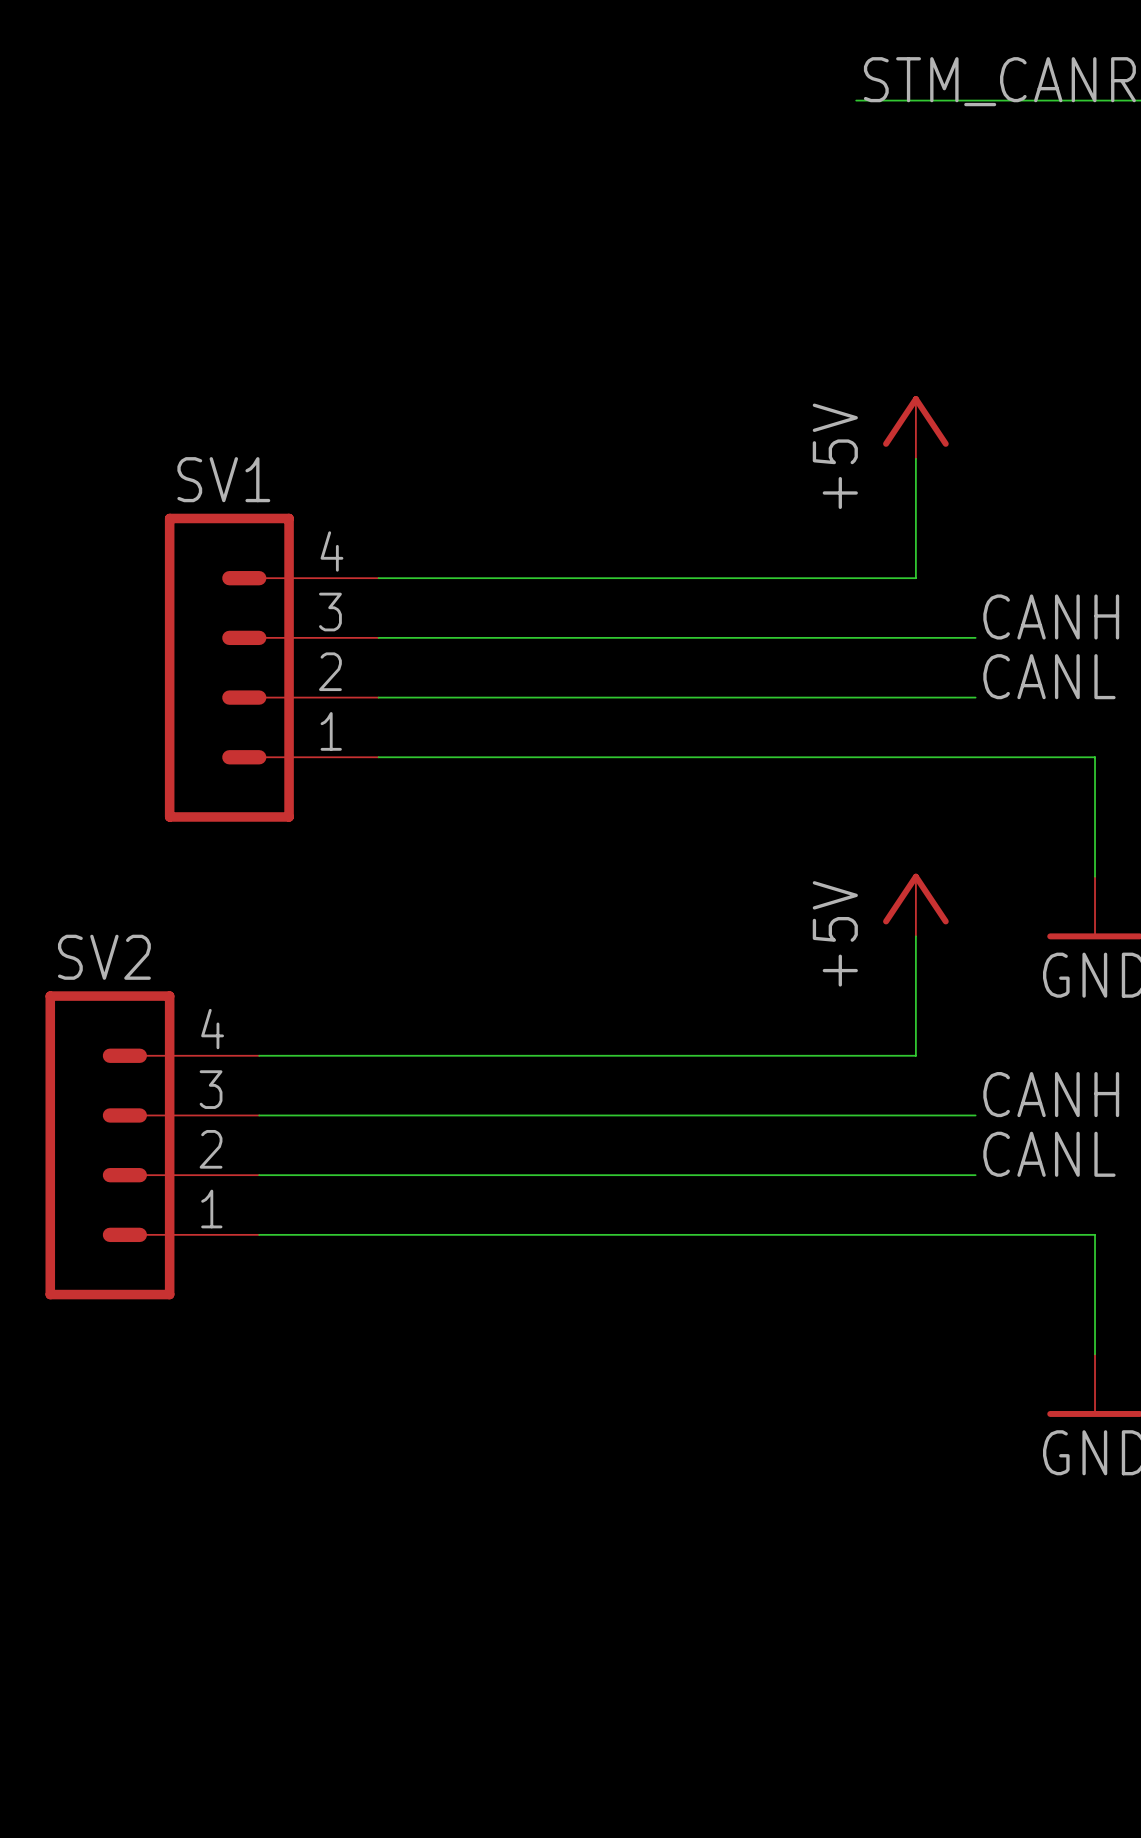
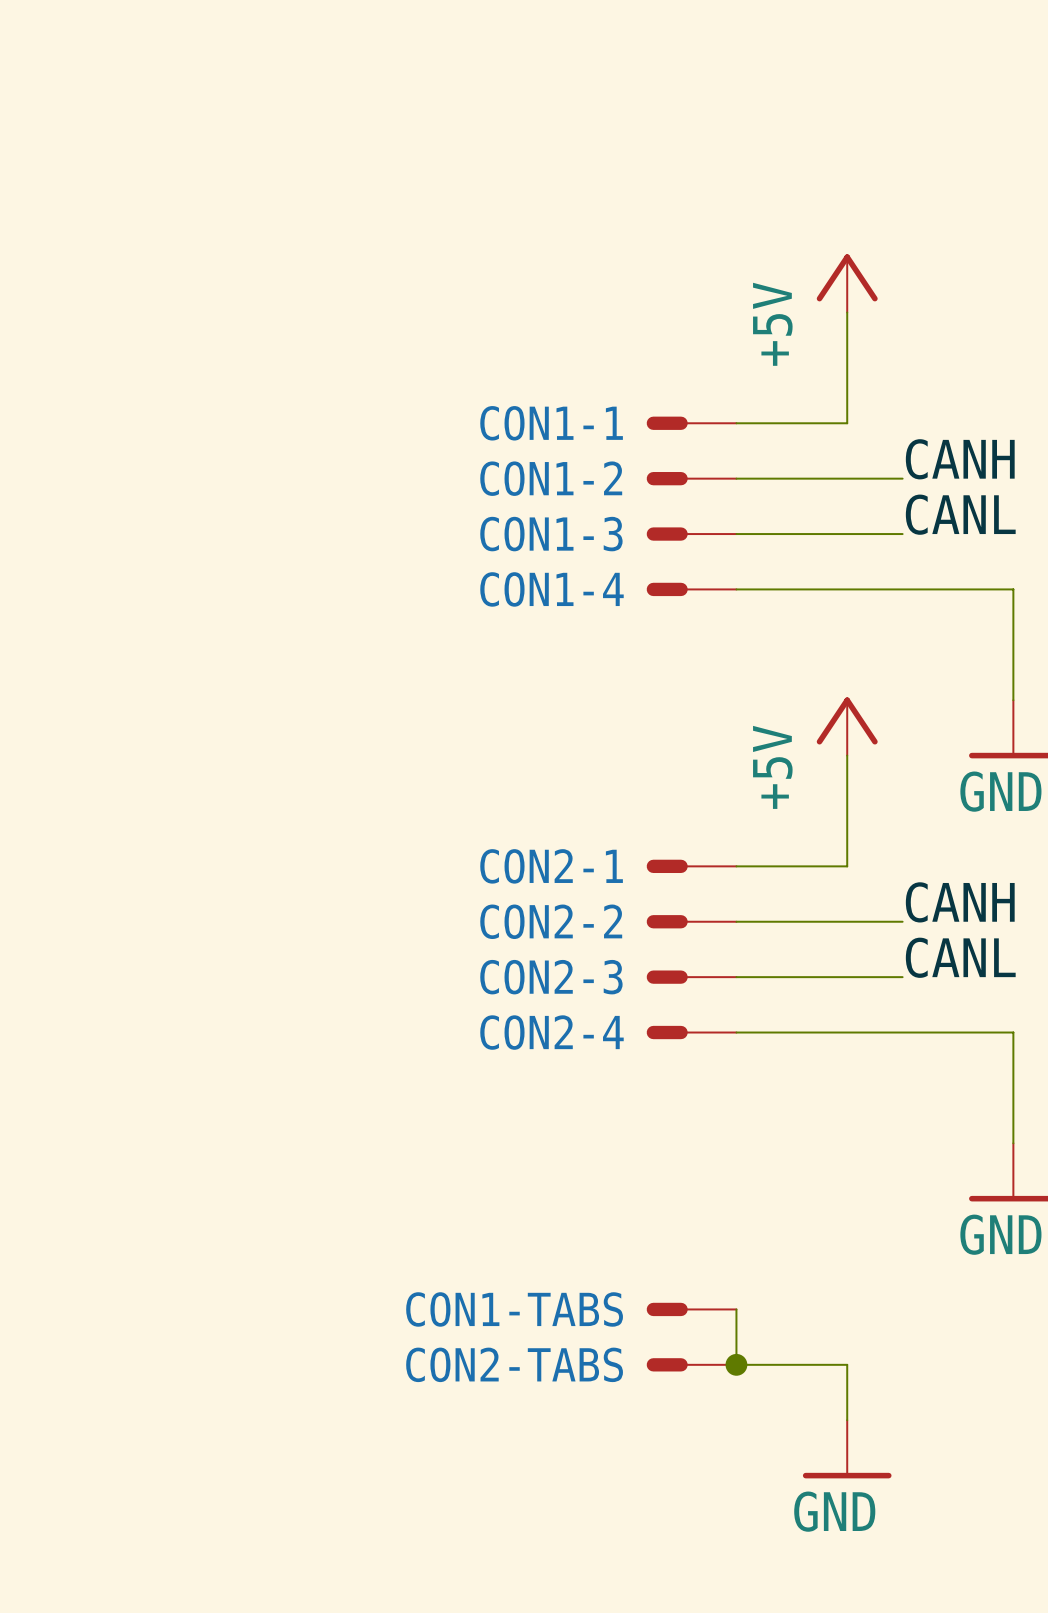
wire: (378, 578) (796, 578) -> none
CON1-1: none -> (691, 423)
wire: (378, 637) (796, 637) -> none
CON1-2: none -> (691, 478)
SV1: (271, 667) -> none
wire: (378, 697) (796, 697) -> none
CON1-3: none -> (691, 534)
wire: (378, 757) (796, 757) -> none
CON1-4: none -> (691, 589)
wire: (259, 1055) (796, 1055) -> none
CON2-1: none -> (691, 866)
wire: (259, 1115) (796, 1115) -> none
CON2-2: none -> (691, 921)
SV2: (152, 1145) -> none
wire: (259, 1175) (796, 1175) -> none
CON2-3: none -> (691, 977)
wire: (259, 1234) (796, 1234) -> none
CON2-4: none -> (691, 1032)
CON1-TABS: none -> (691, 1309)
wire: none -> (736, 1309) (736, 1364) (847, 1364) (847, 1420)
CON2-TABS: none -> (691, 1364)
junction: none -> (736, 1364)
power symbol: none -> GND (847, 1449)

